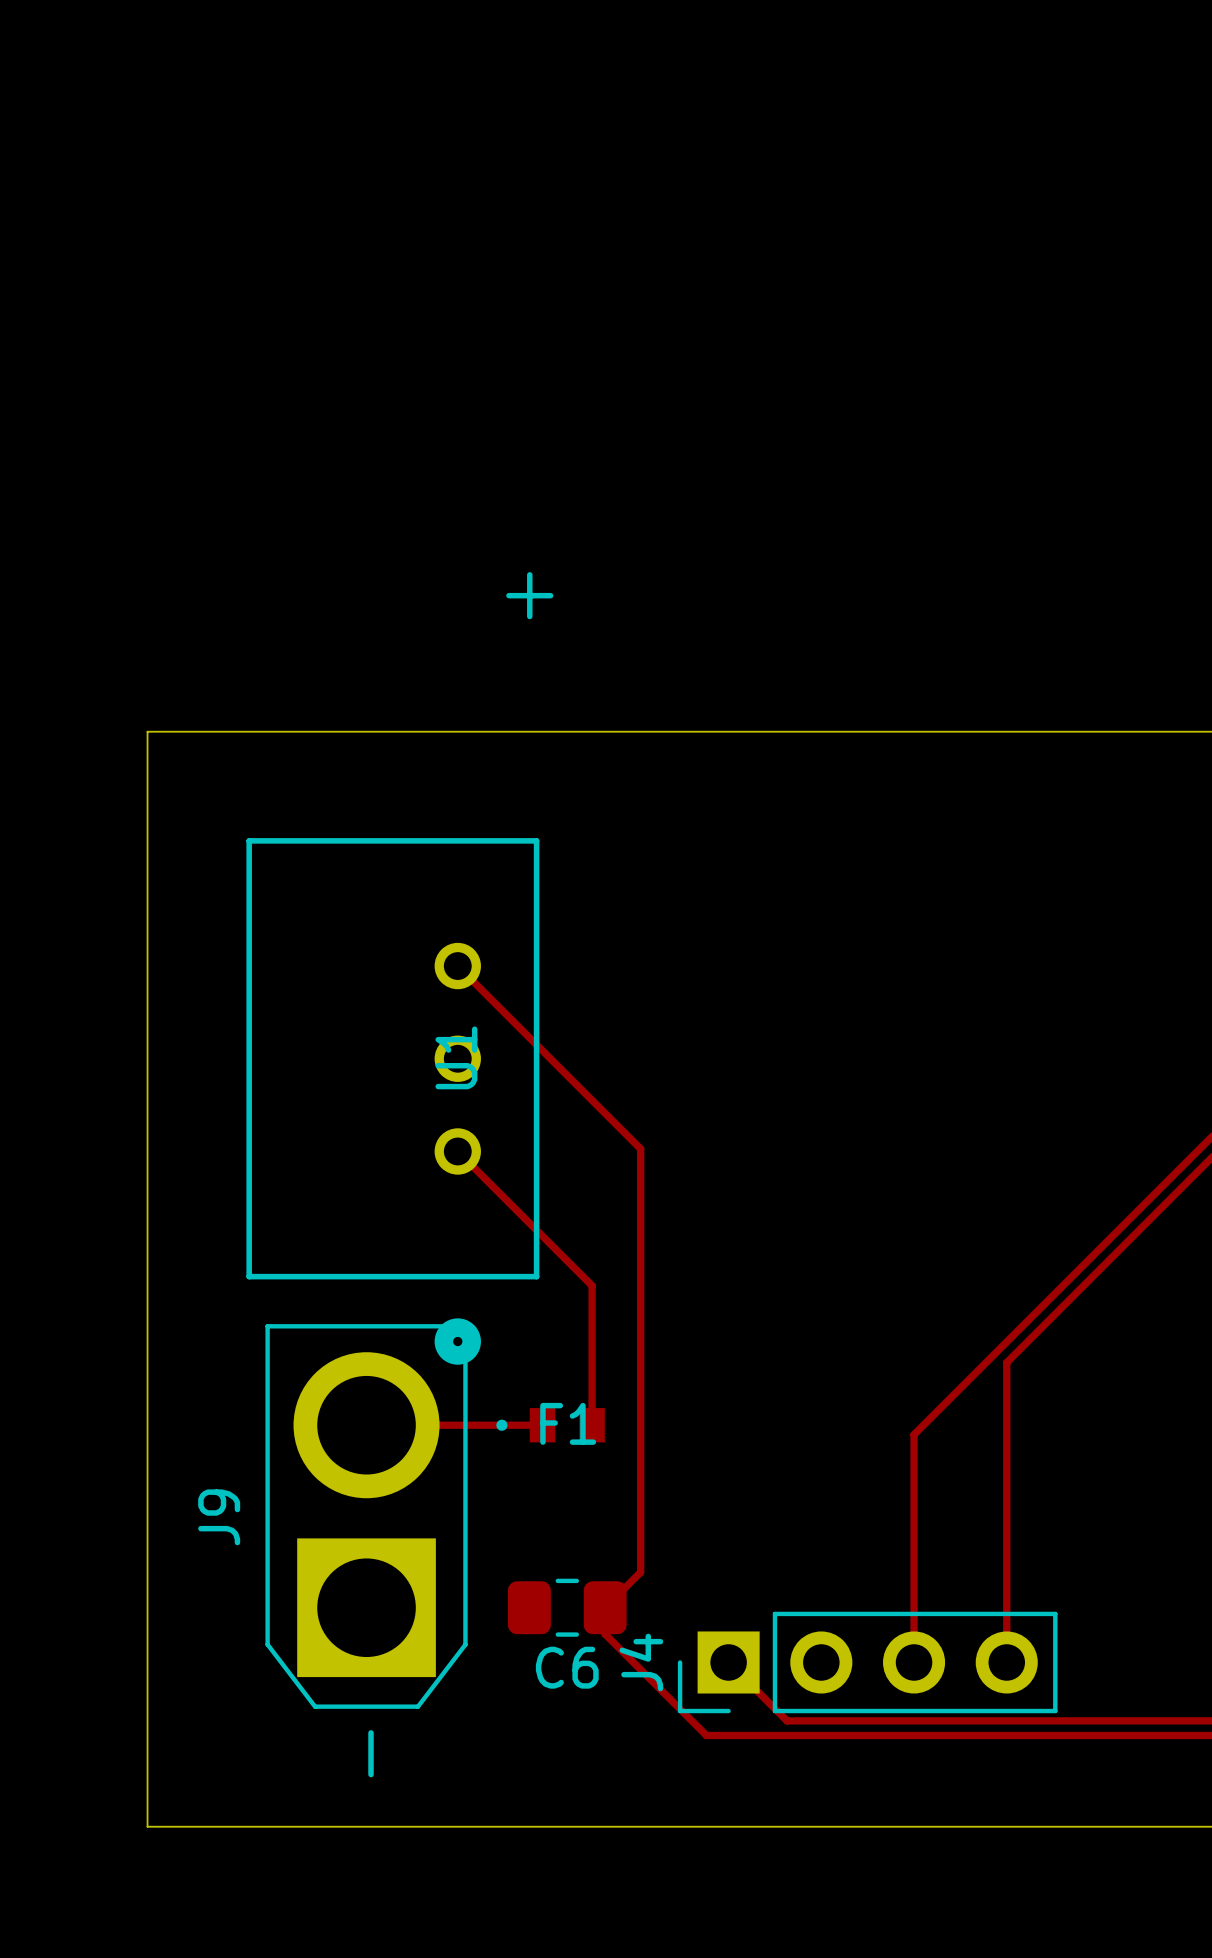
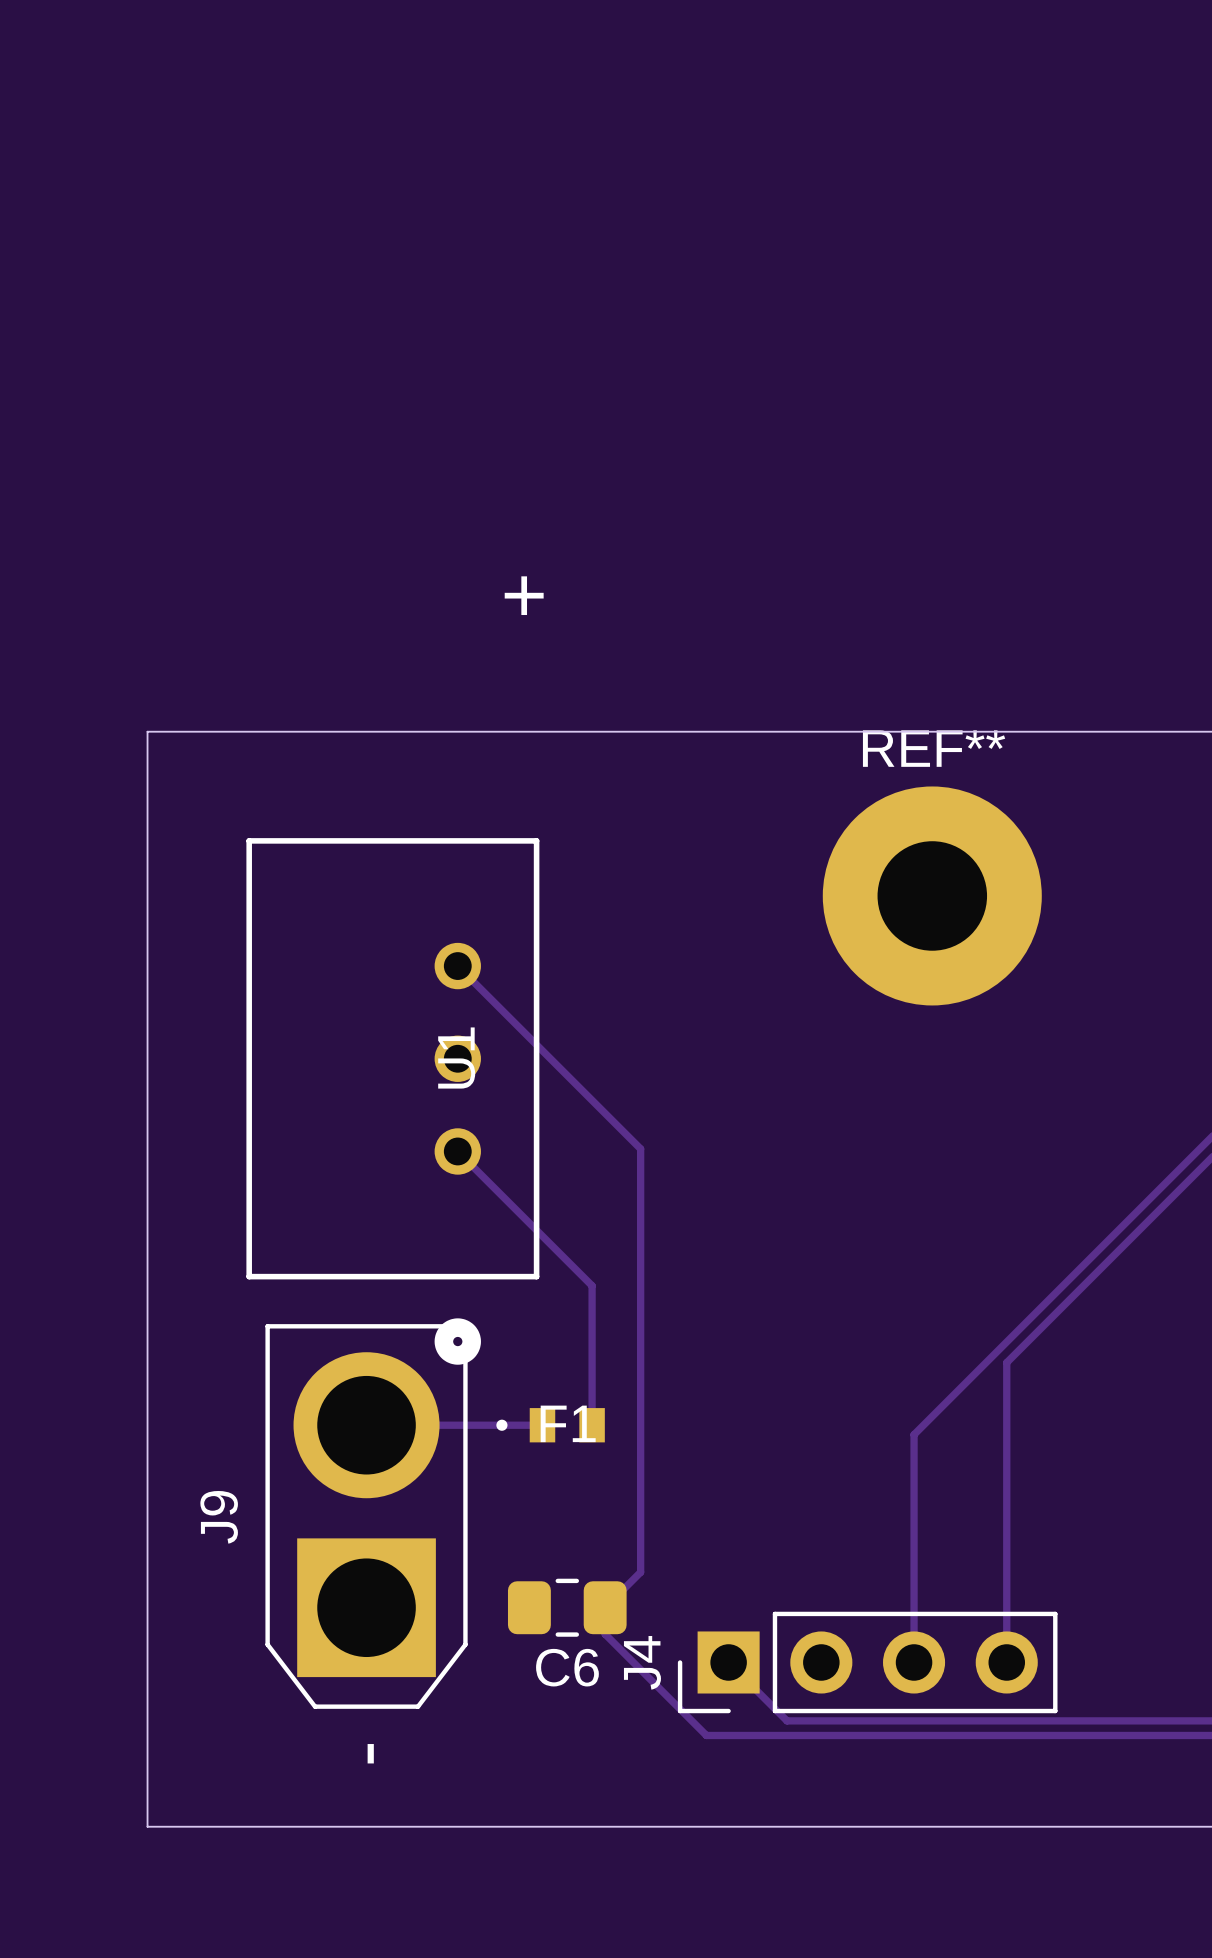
REF**: none -> (932, 895)

